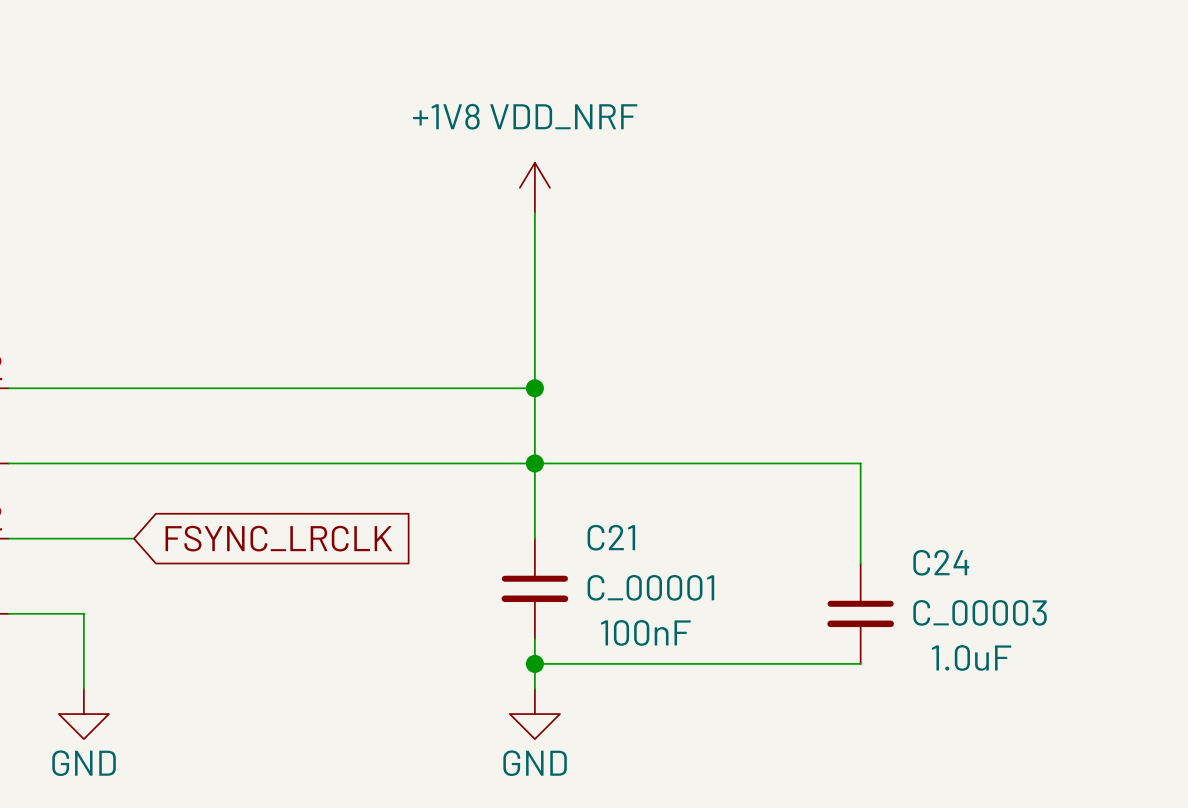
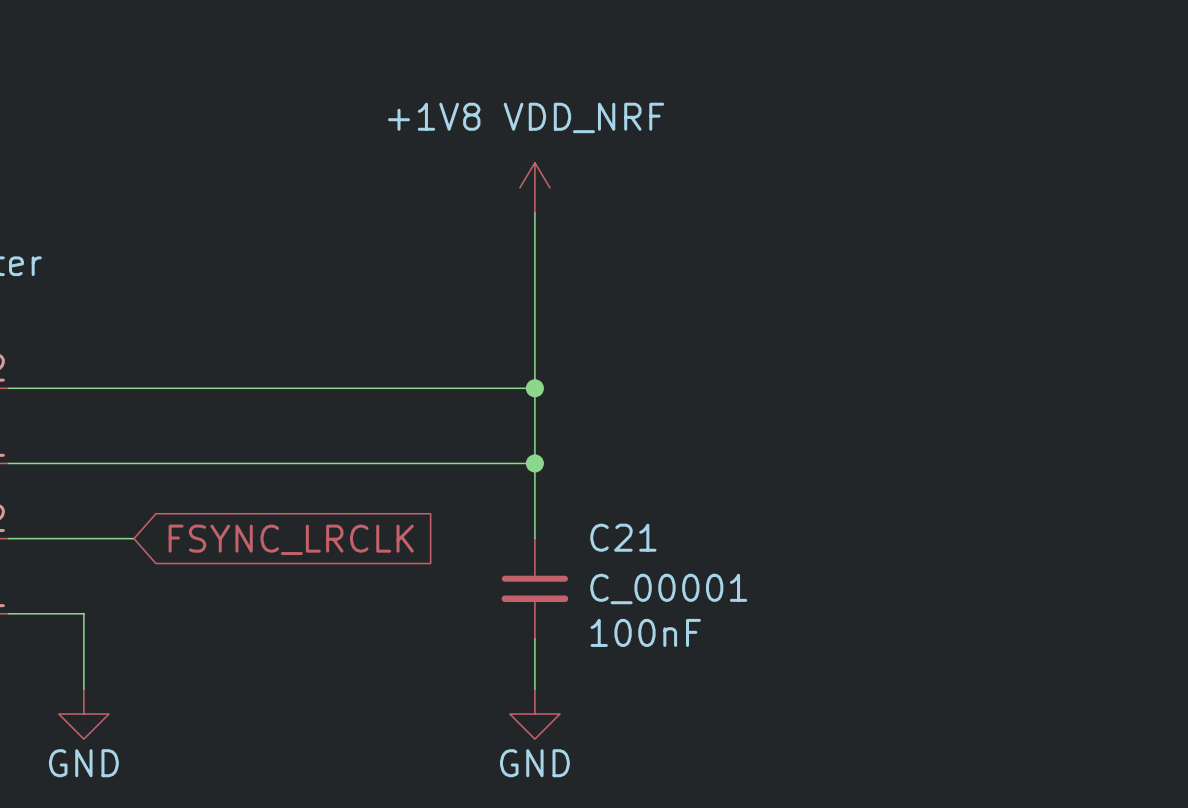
wire: (534, 463) (860, 463) (860, 563) -> none
C24: C_00003 (860, 613) -> none
wire: (534, 663) (860, 663) -> none
junction: (534, 663) -> none

